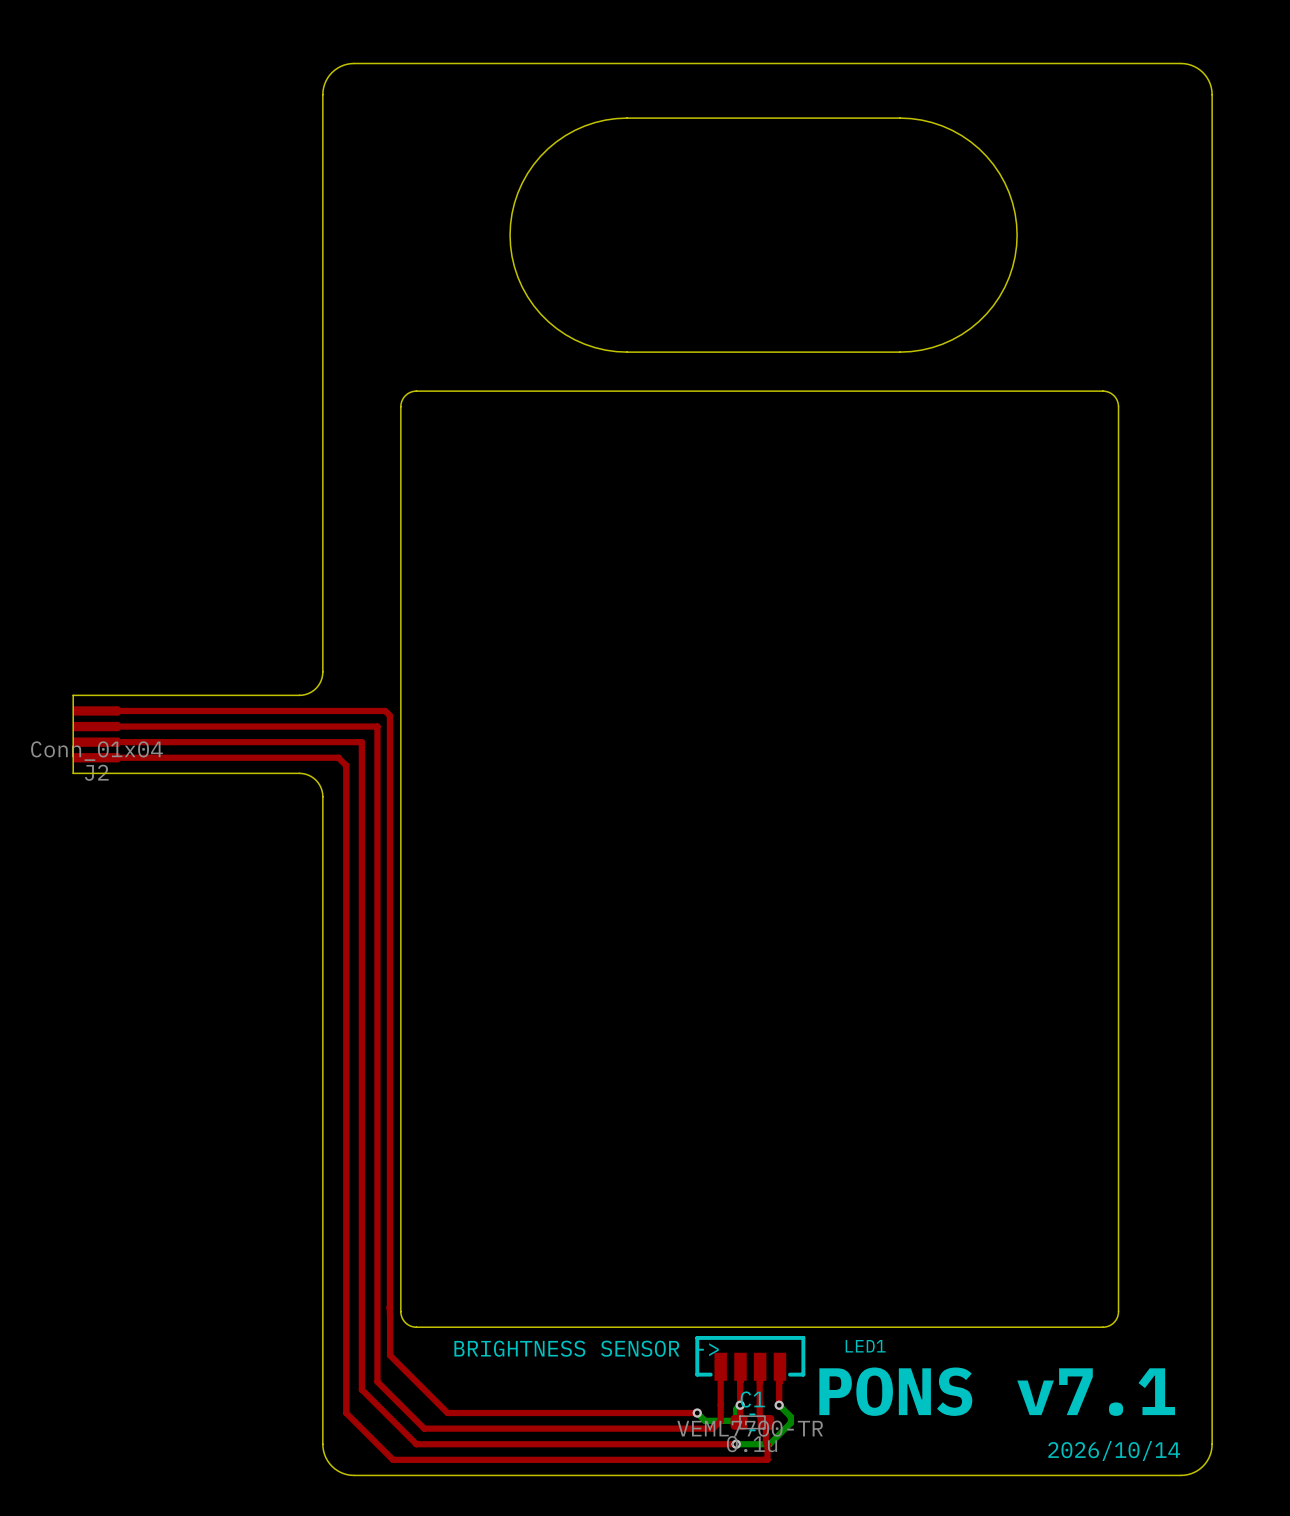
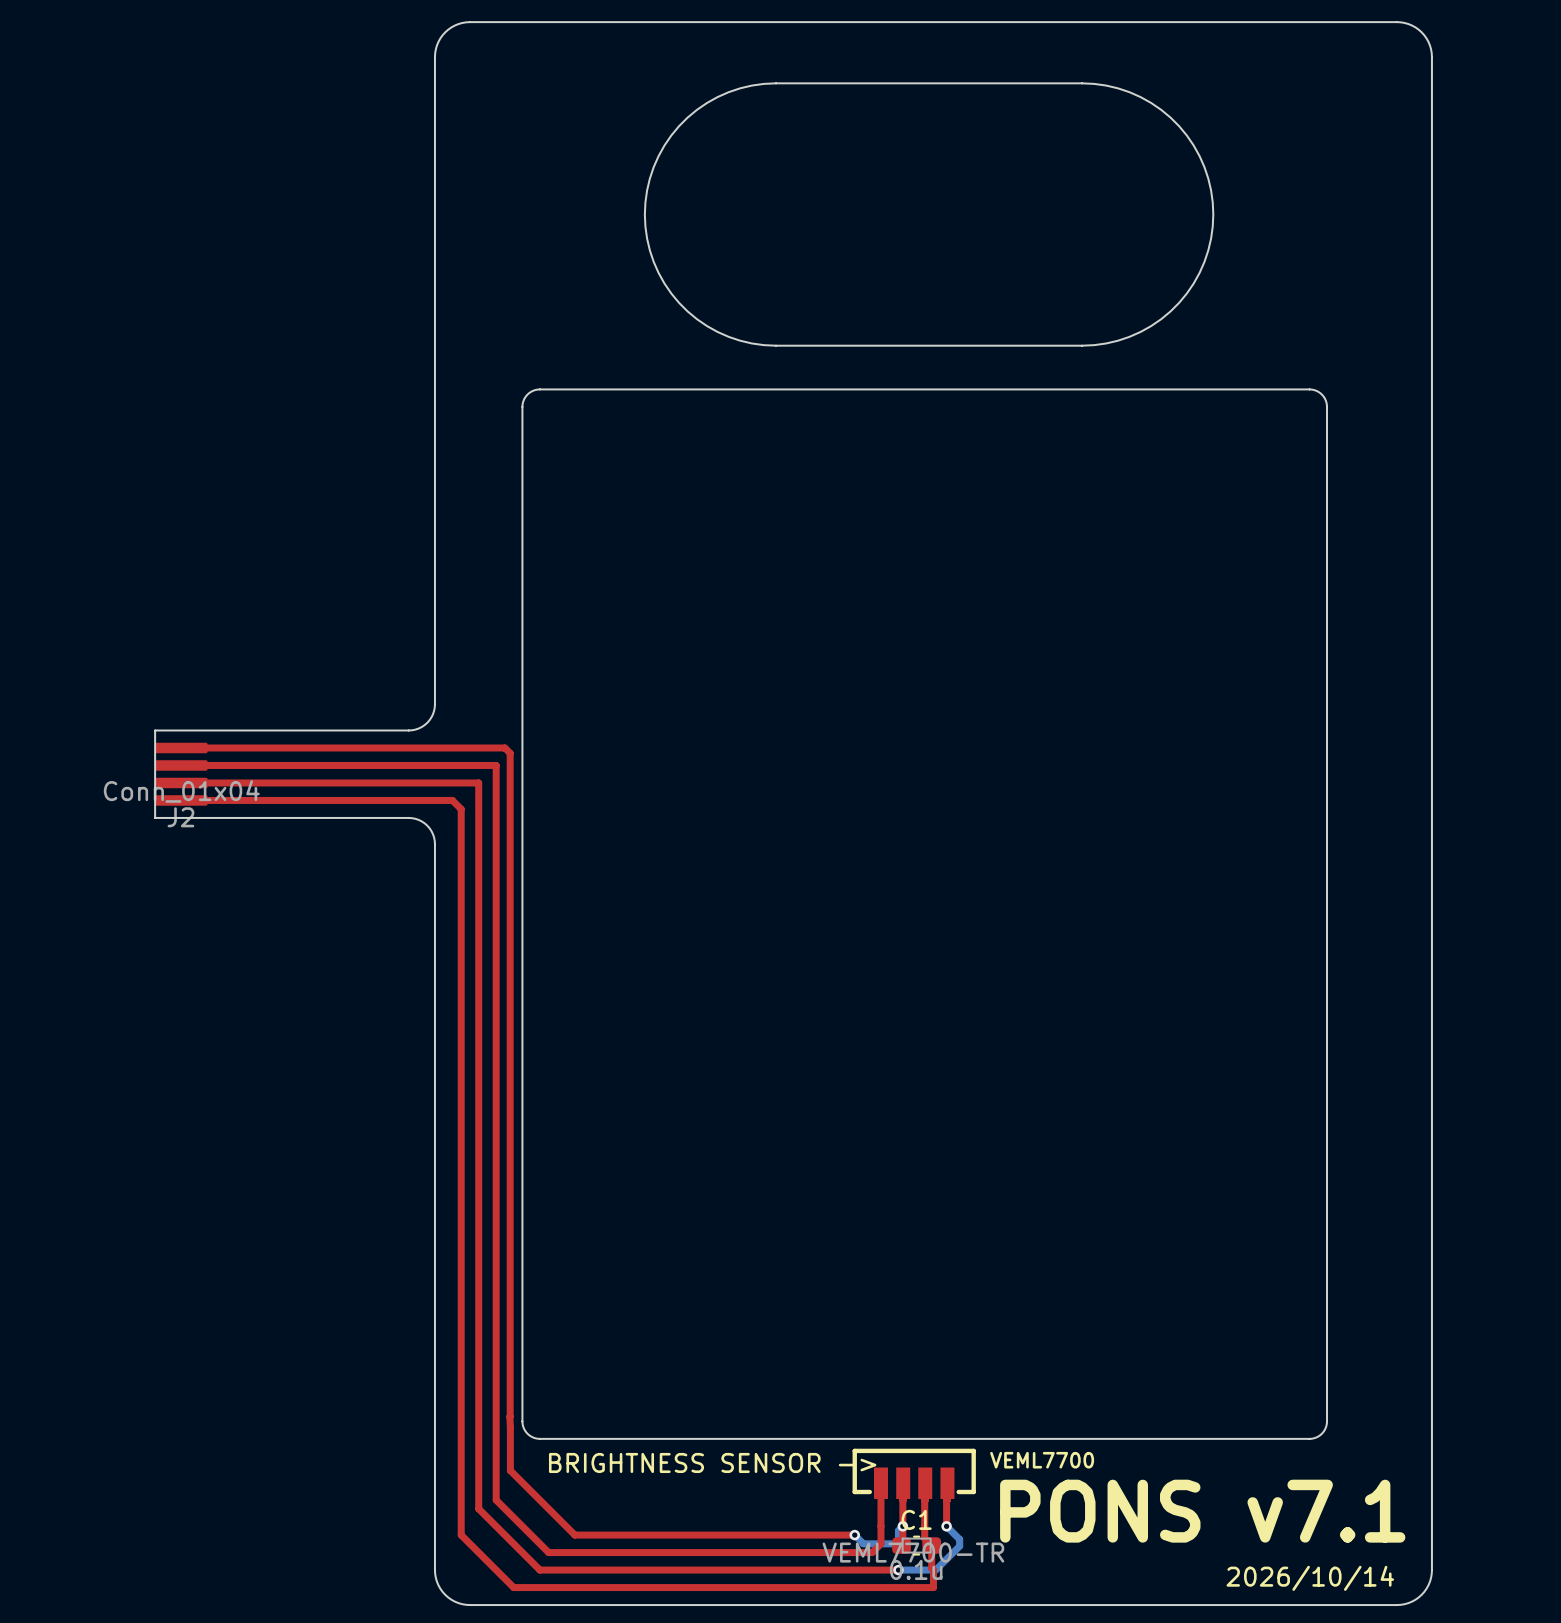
LED1 name: LED1 (865, 1346) -> VEML7700 (1042, 1460)

